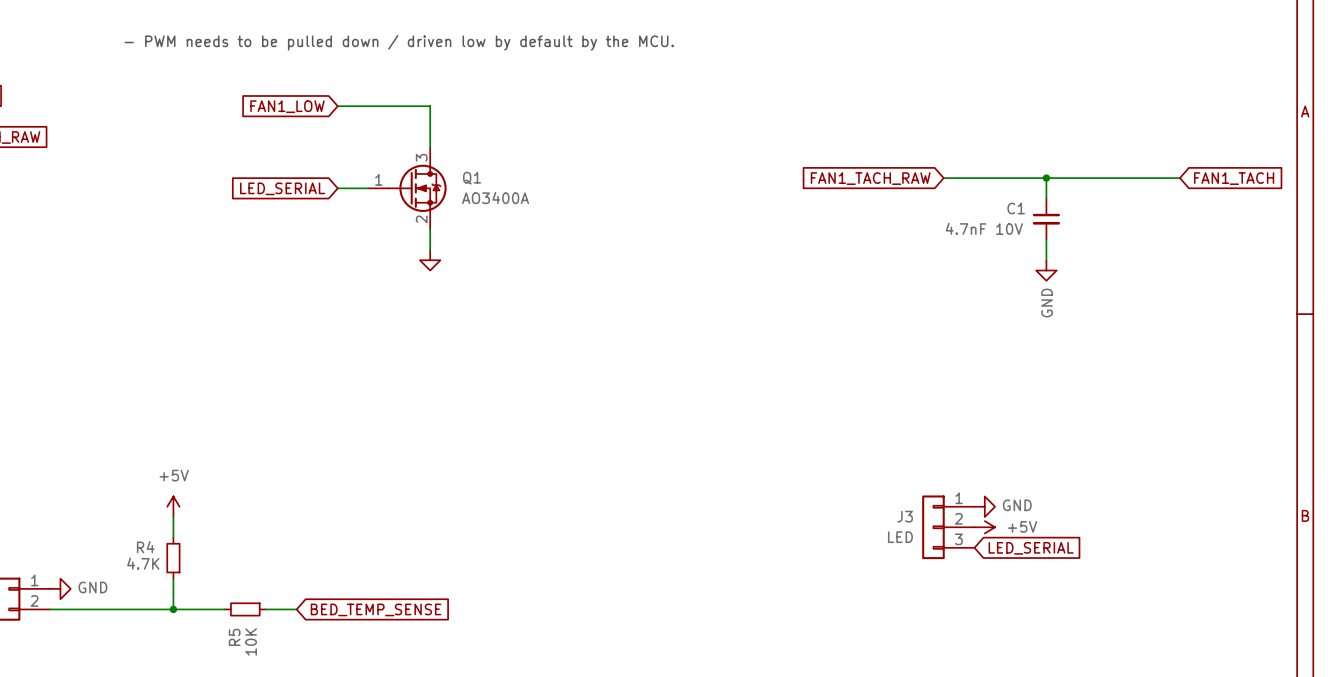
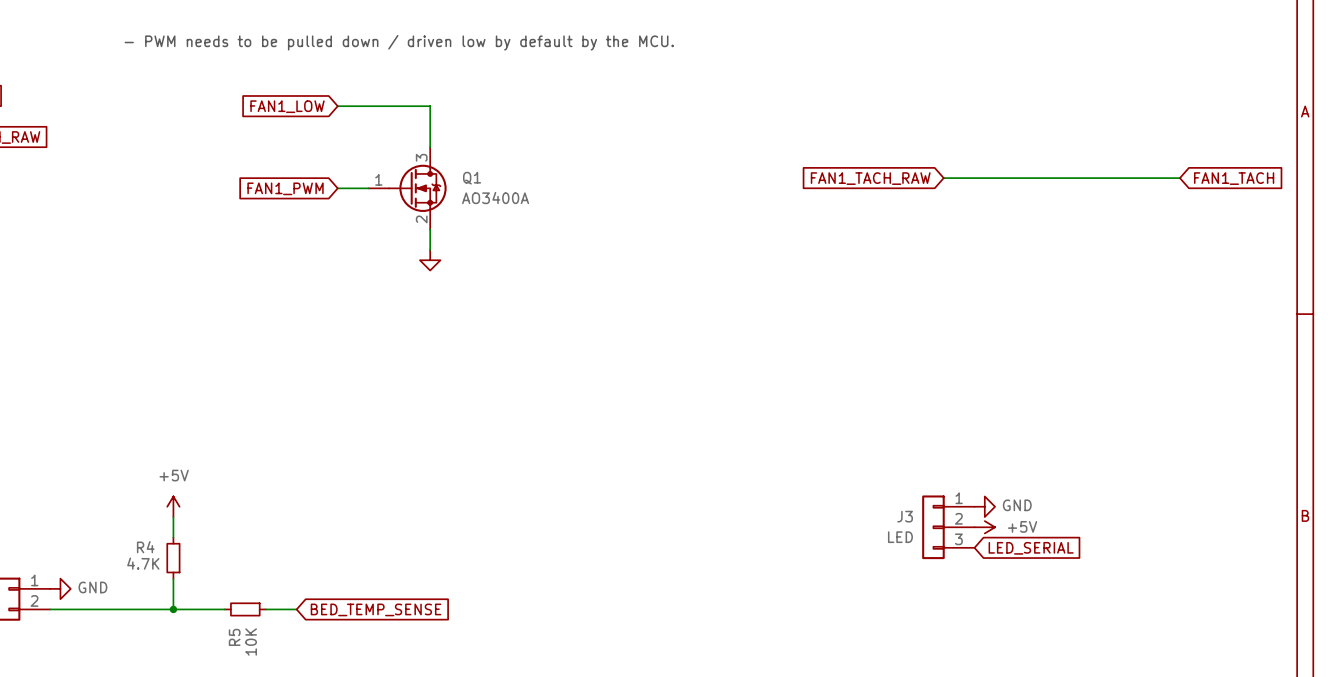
wire: (1046, 178) (1046, 198) -> none
junction: (1046, 178) -> none
global label: LED_SERIAL (282, 188) -> FAN1_PWM (285, 188)
C1: 4.7nF 10V (1046, 219) -> none
wire: (1046, 239) (1046, 260) -> none
power symbol: GND (1046, 270) -> none

